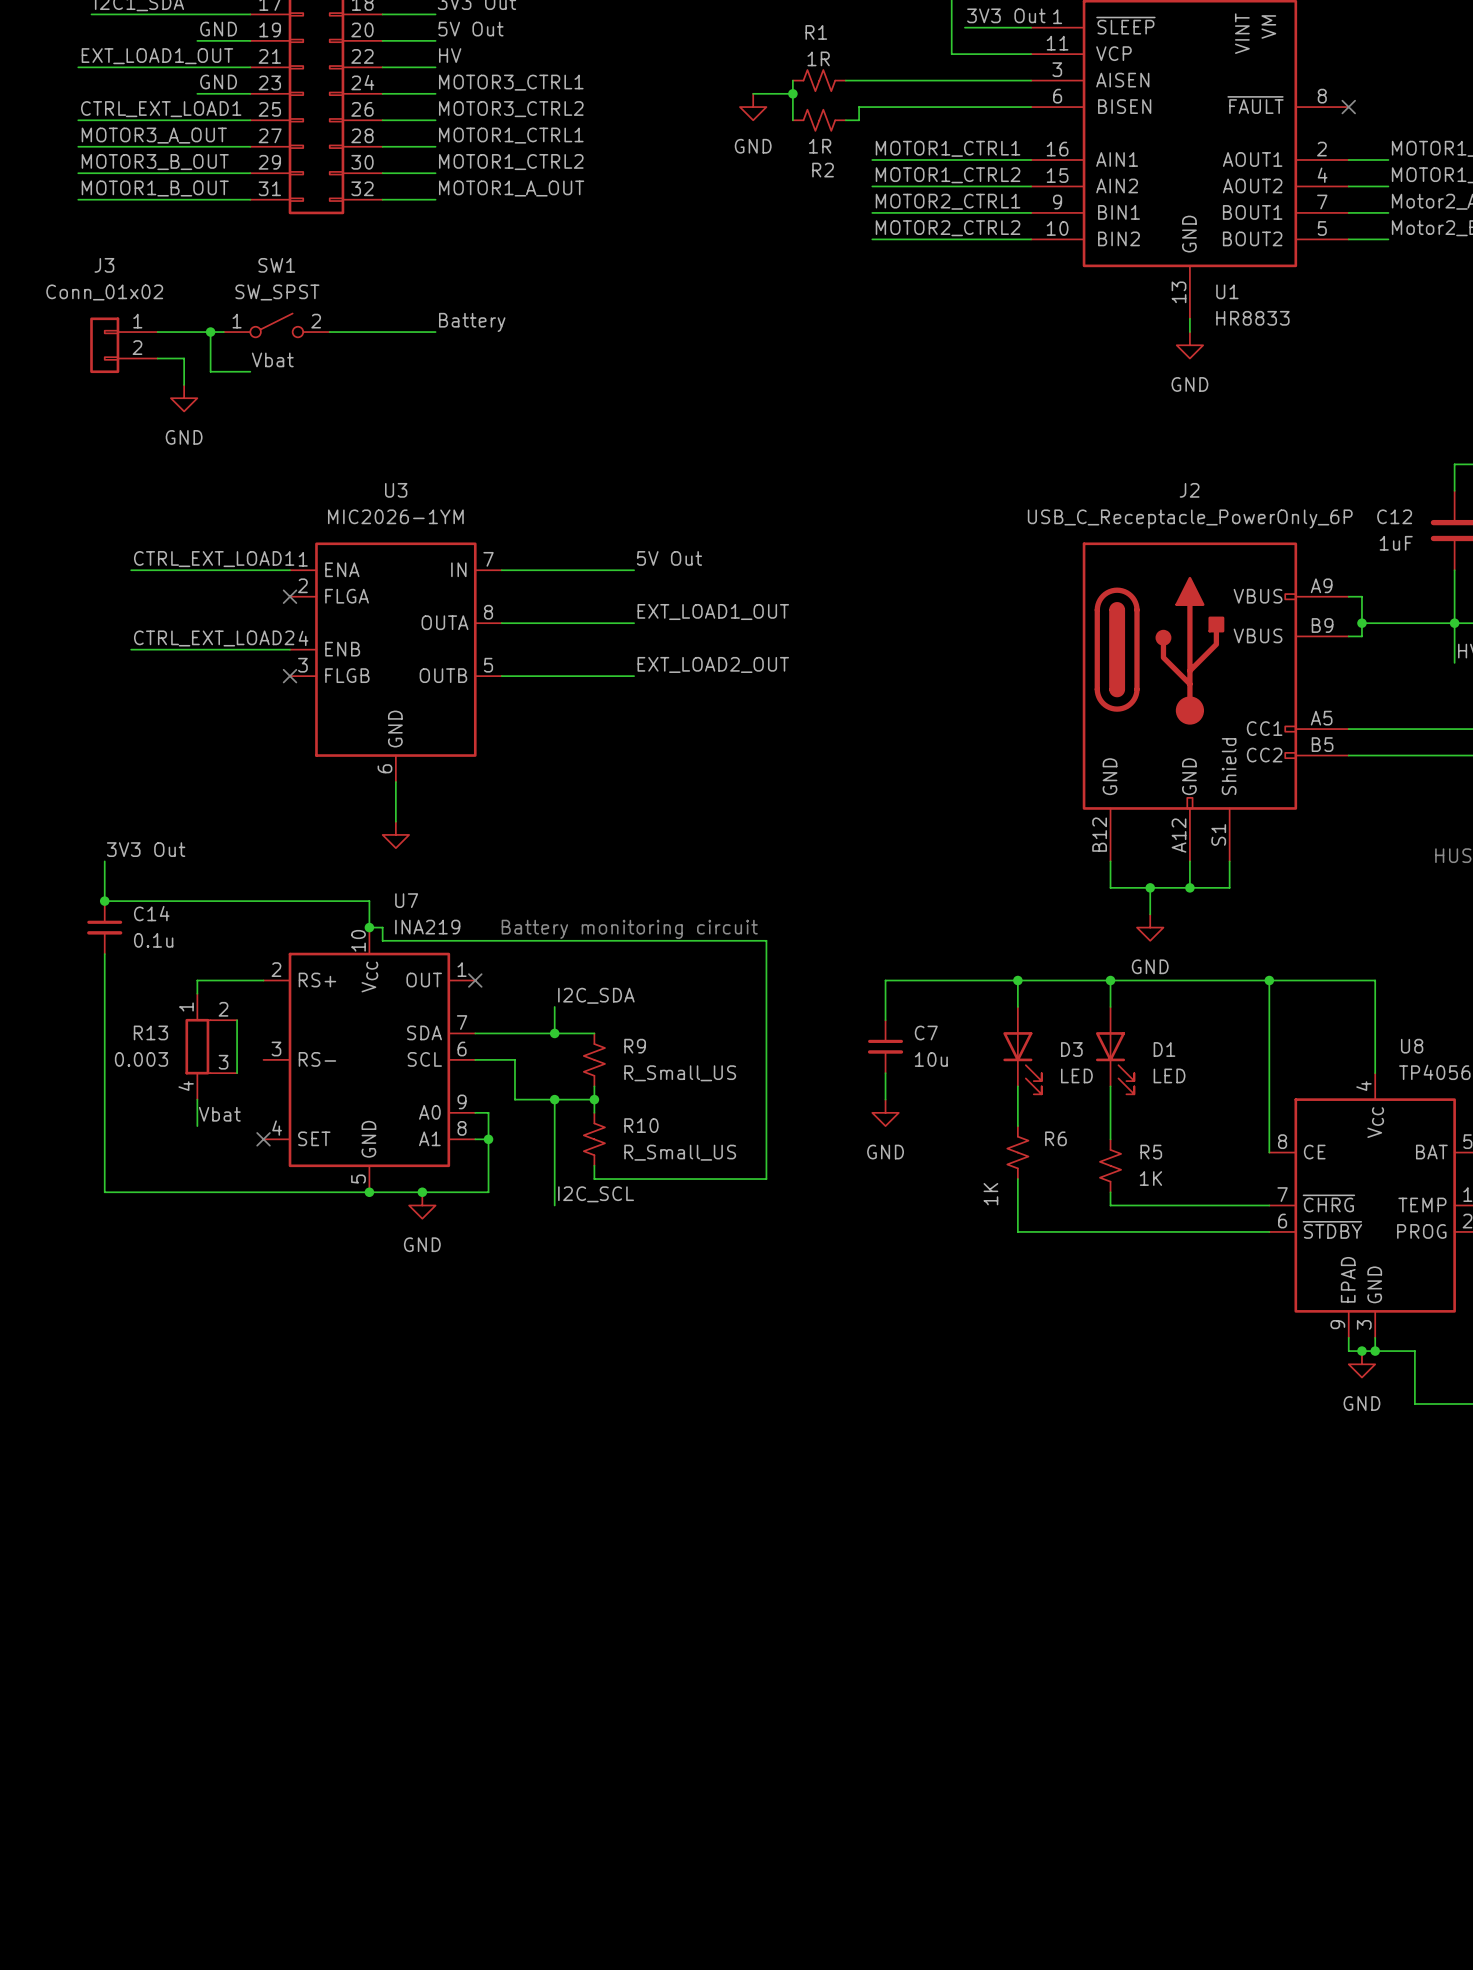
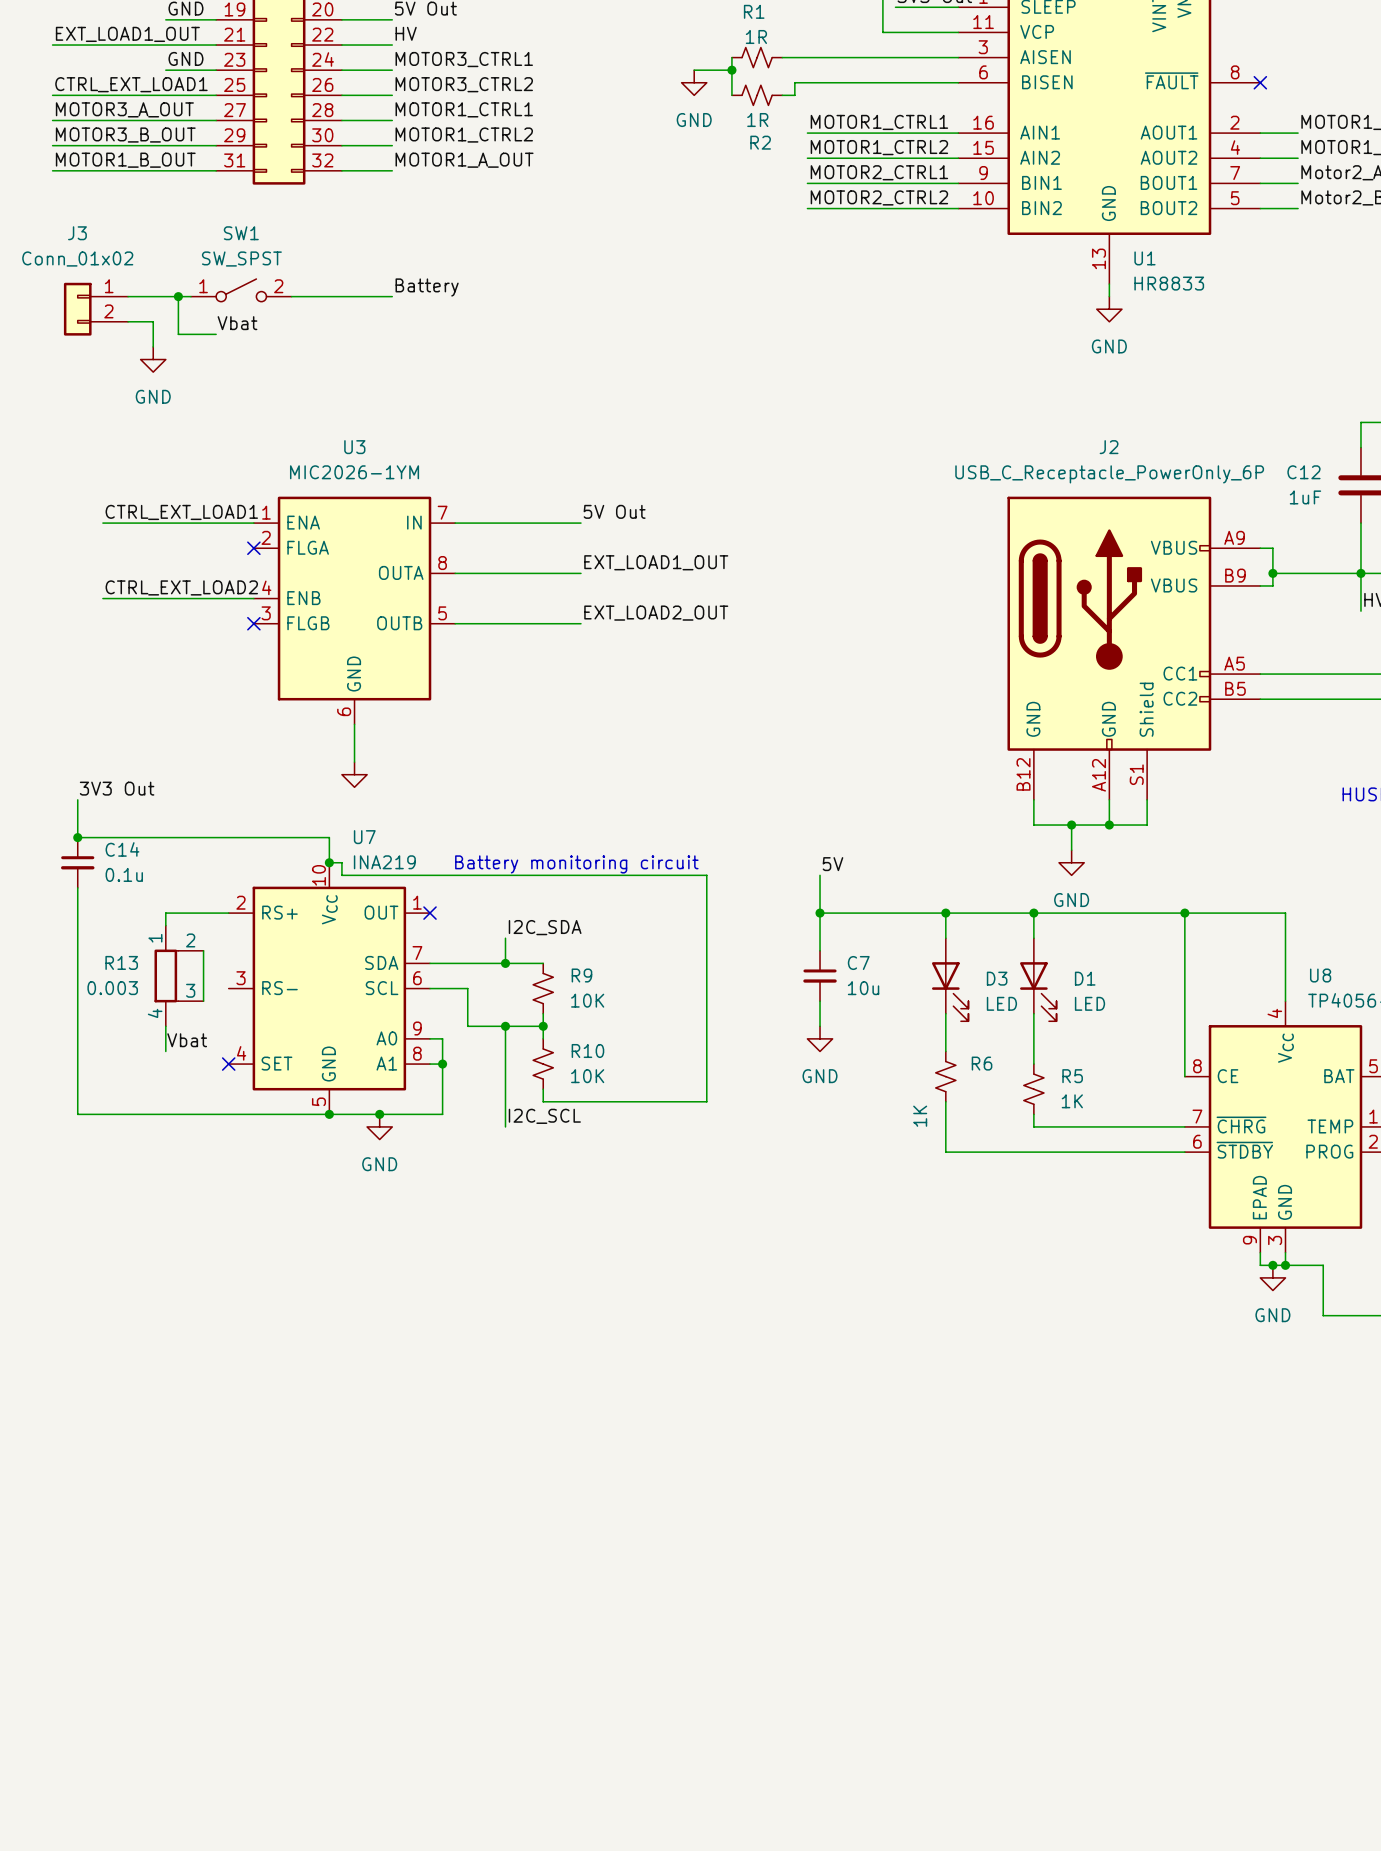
label: none -> 5V (832, 864)
wire: none -> (820, 875) (820, 913)
junction: none -> (820, 913)
R9 value: R_Small_US (680, 1073) -> 10K (587, 1000)
R10 value: R_Small_US (680, 1152) -> 10K (587, 1076)

